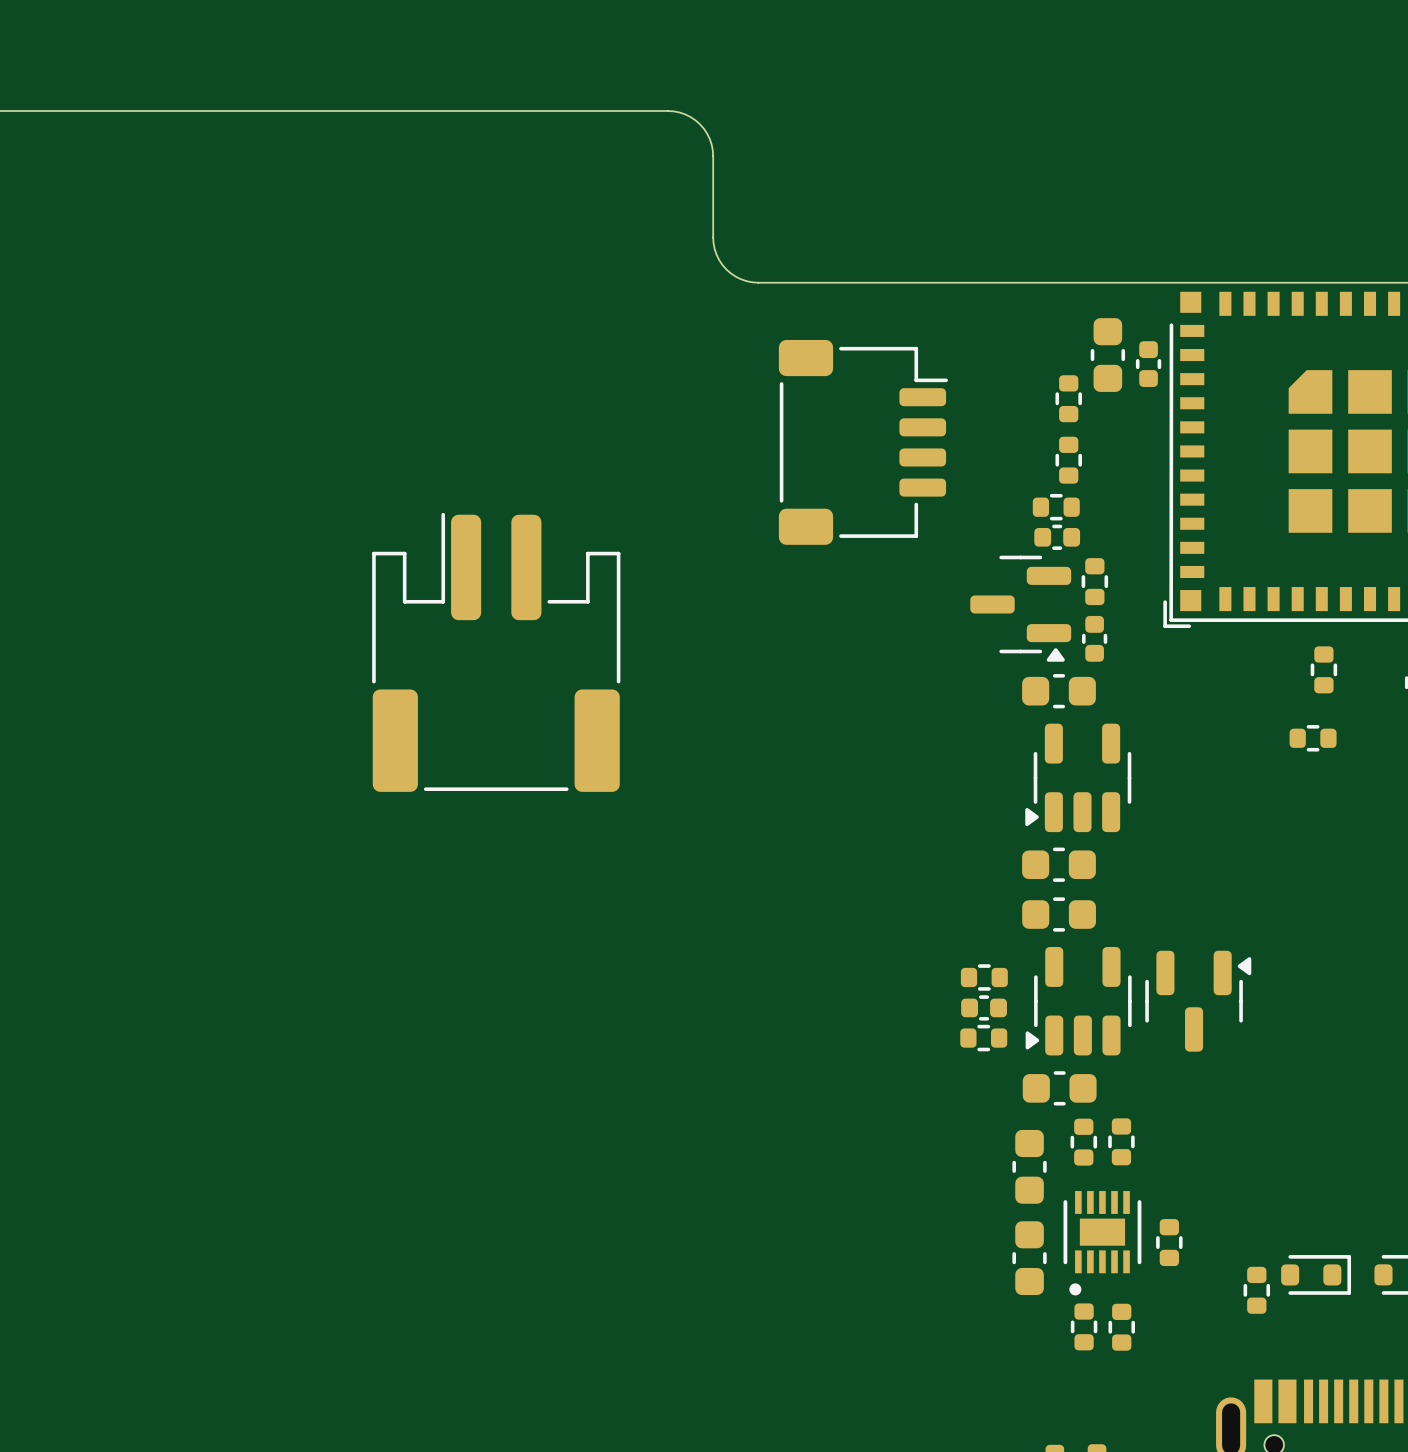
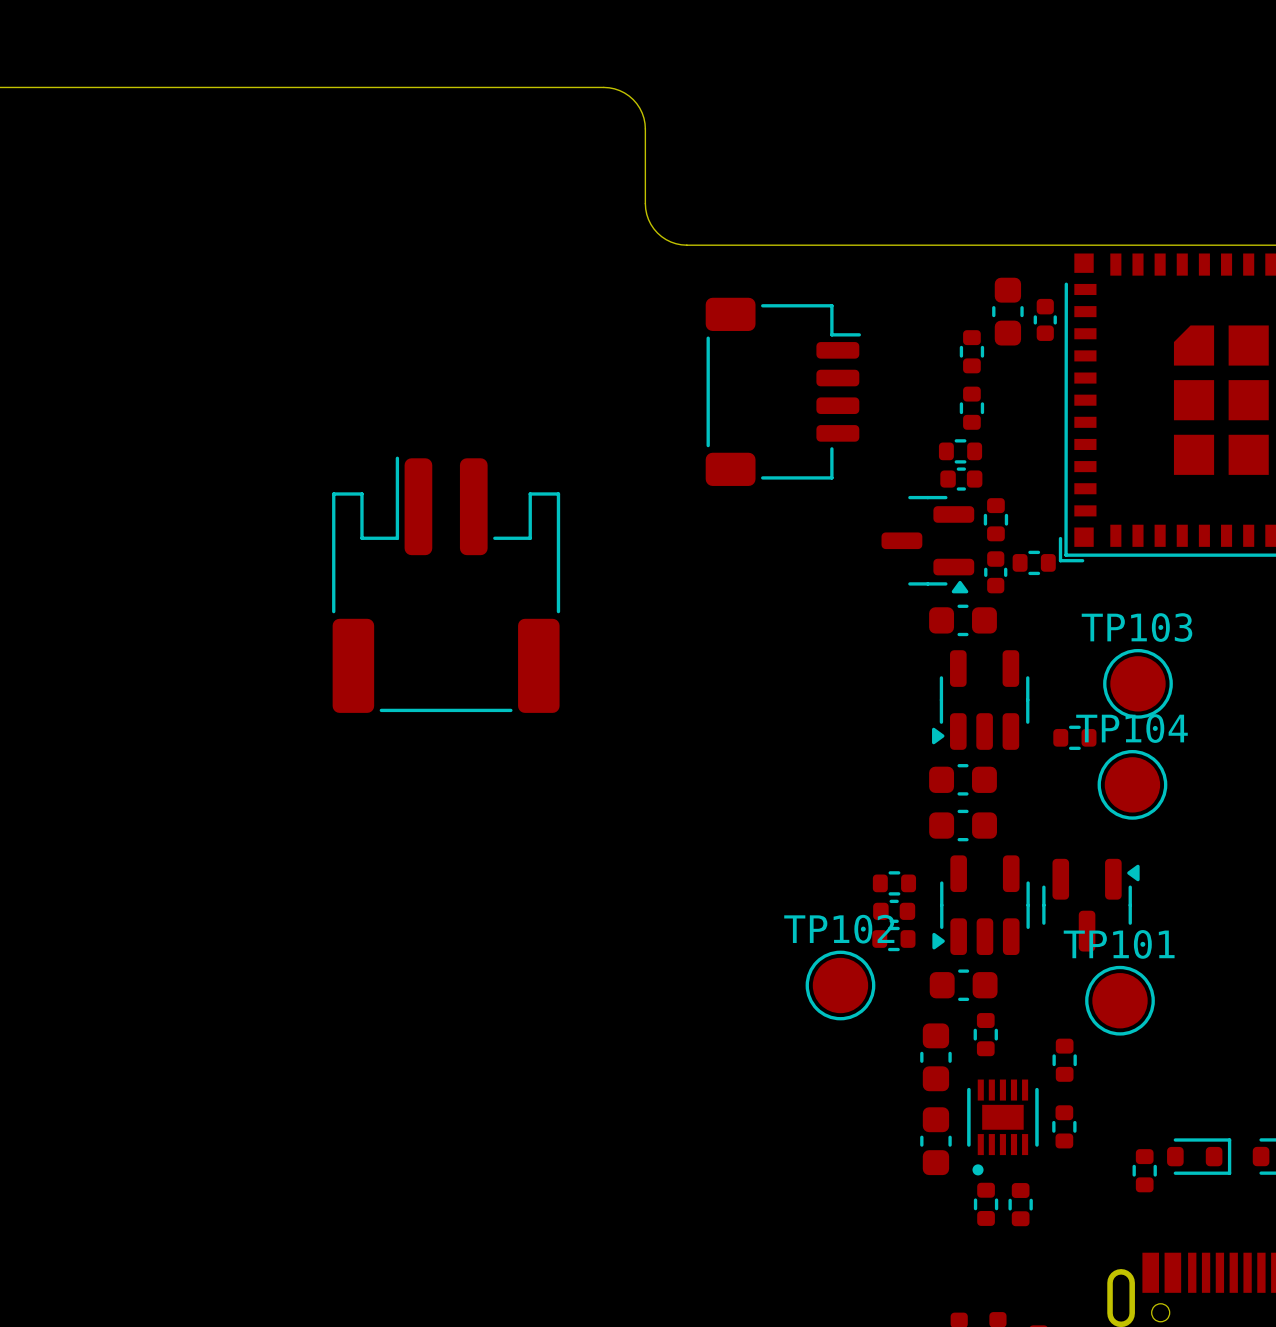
part: none -> (1034, 562)
part: (1323, 669) -> none
part: (1313, 738) -> none
TP103: none -> (1137, 683)
part: none -> (1074, 737)
TP104: none -> (1132, 784)
TP102: none -> (840, 985)
TP101: none -> (1120, 1000)
part position: (1121, 1141) -> (1064, 1060)

